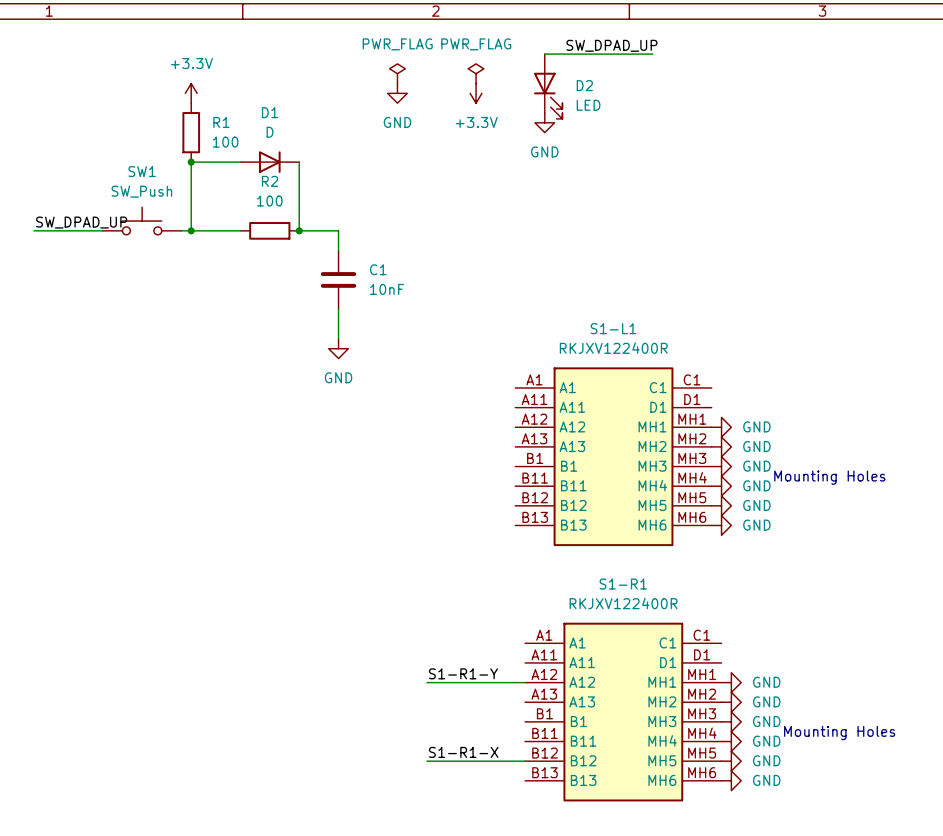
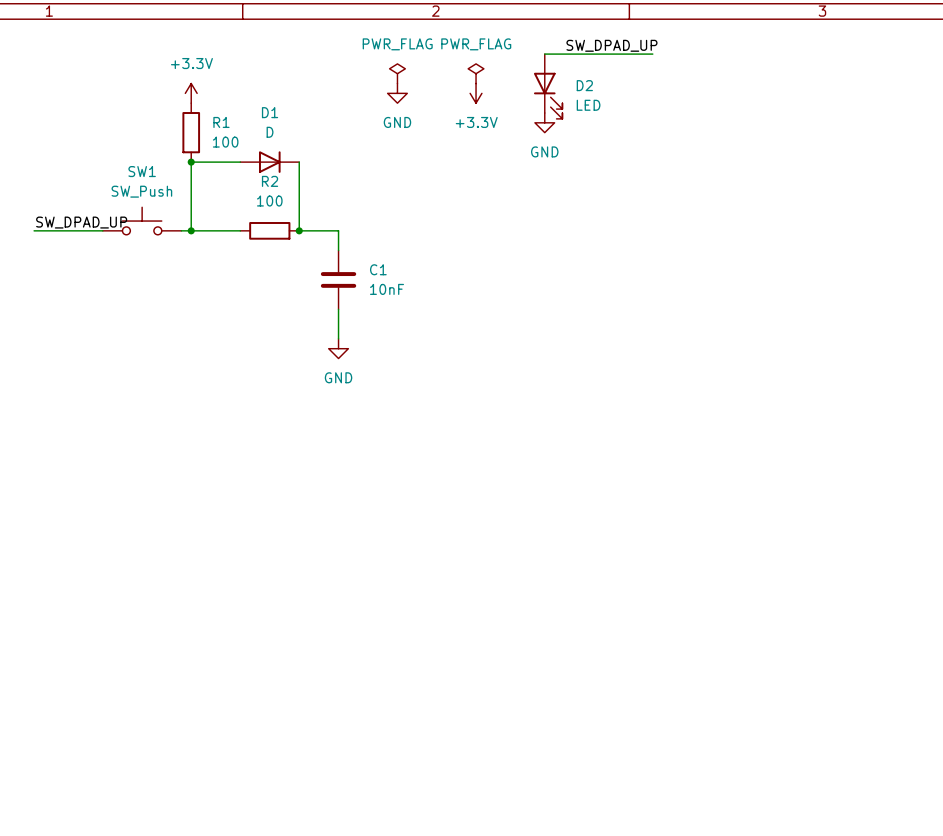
power symbol: GND (721, 427) -> none
power symbol: GND (721, 446) -> none
S1-L1: RKJXV122400R (613, 456) -> none
power symbol: GND (721, 466) -> none
text: Mounting Holes (829, 477) -> none
power symbol: GND (721, 486) -> none
power symbol: GND (721, 505) -> none
power symbol: GND (721, 525) -> none
label: S1-R1-Y (463, 673) -> none
wire: (426, 682) (525, 682) -> none
power symbol: GND (731, 682) -> none
power symbol: GND (731, 702) -> none
S1-R1: RKJXV122400R (623, 712) -> none
power symbol: GND (731, 721) -> none
text: Mounting Holes (839, 733) -> none
power symbol: GND (731, 741) -> none
label: S1-R1-X (463, 752) -> none
wire: (426, 761) (525, 761) -> none
power symbol: GND (731, 761) -> none
power symbol: GND (731, 780) -> none

